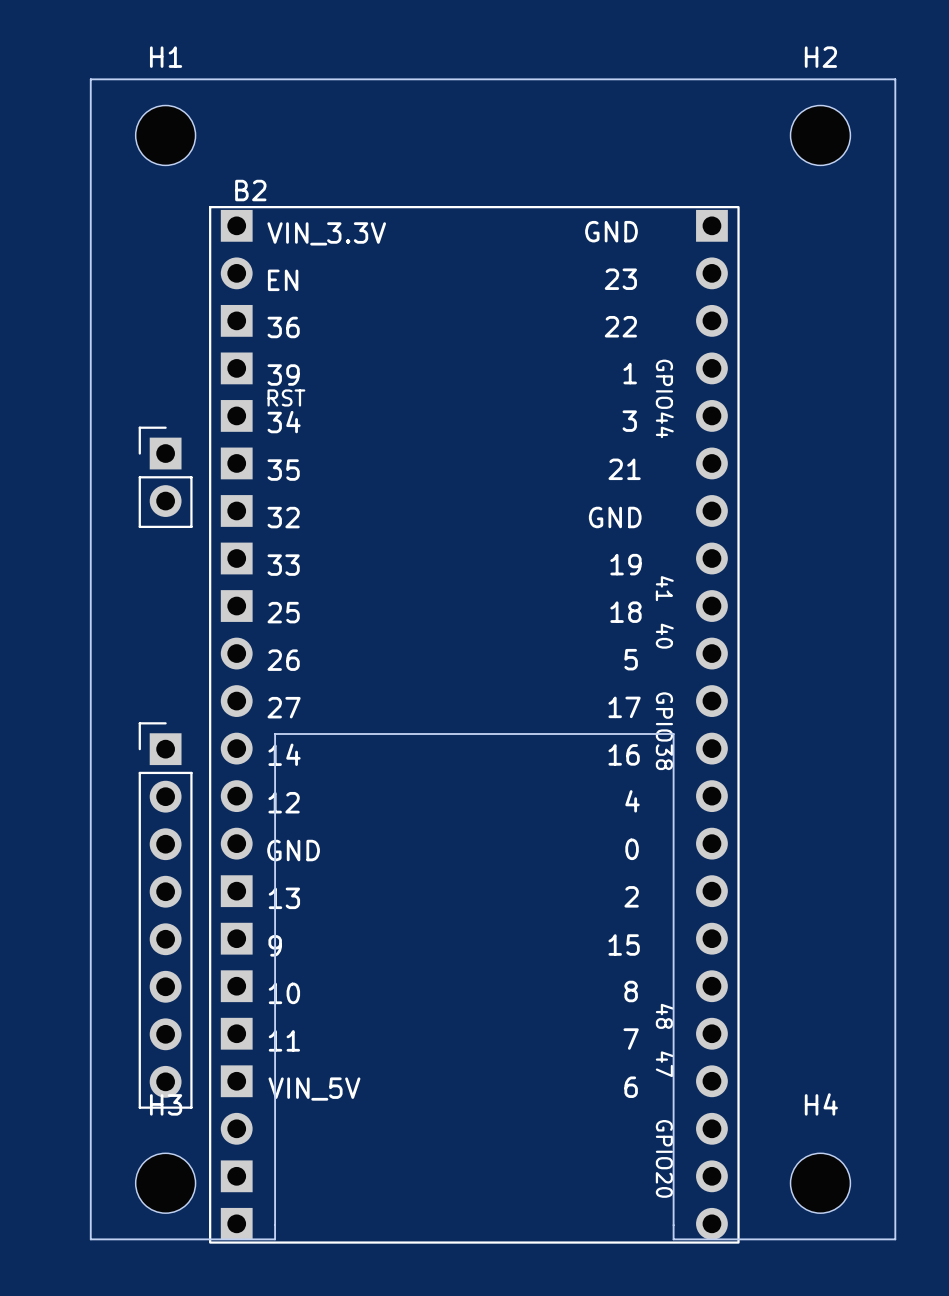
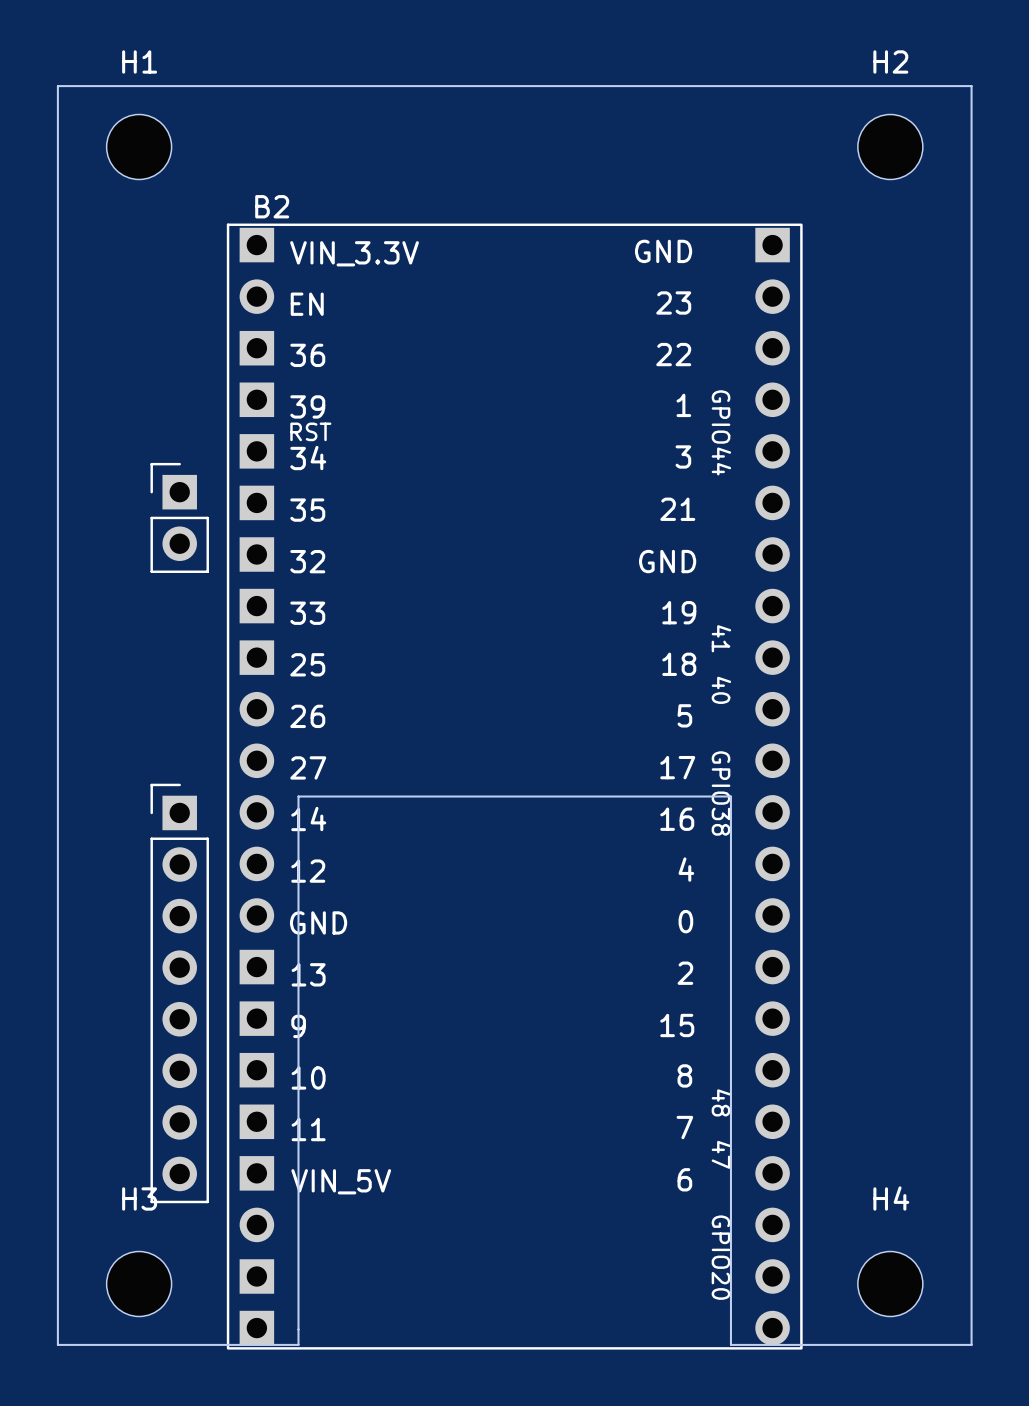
board edge: (90, 79) (90, 1239) -> (98, 86) (57, 86) (57, 1344) (98, 1344)
H1 position: (165, 135) -> (139, 147)
H3 position: (165, 1183) -> (139, 1284)

